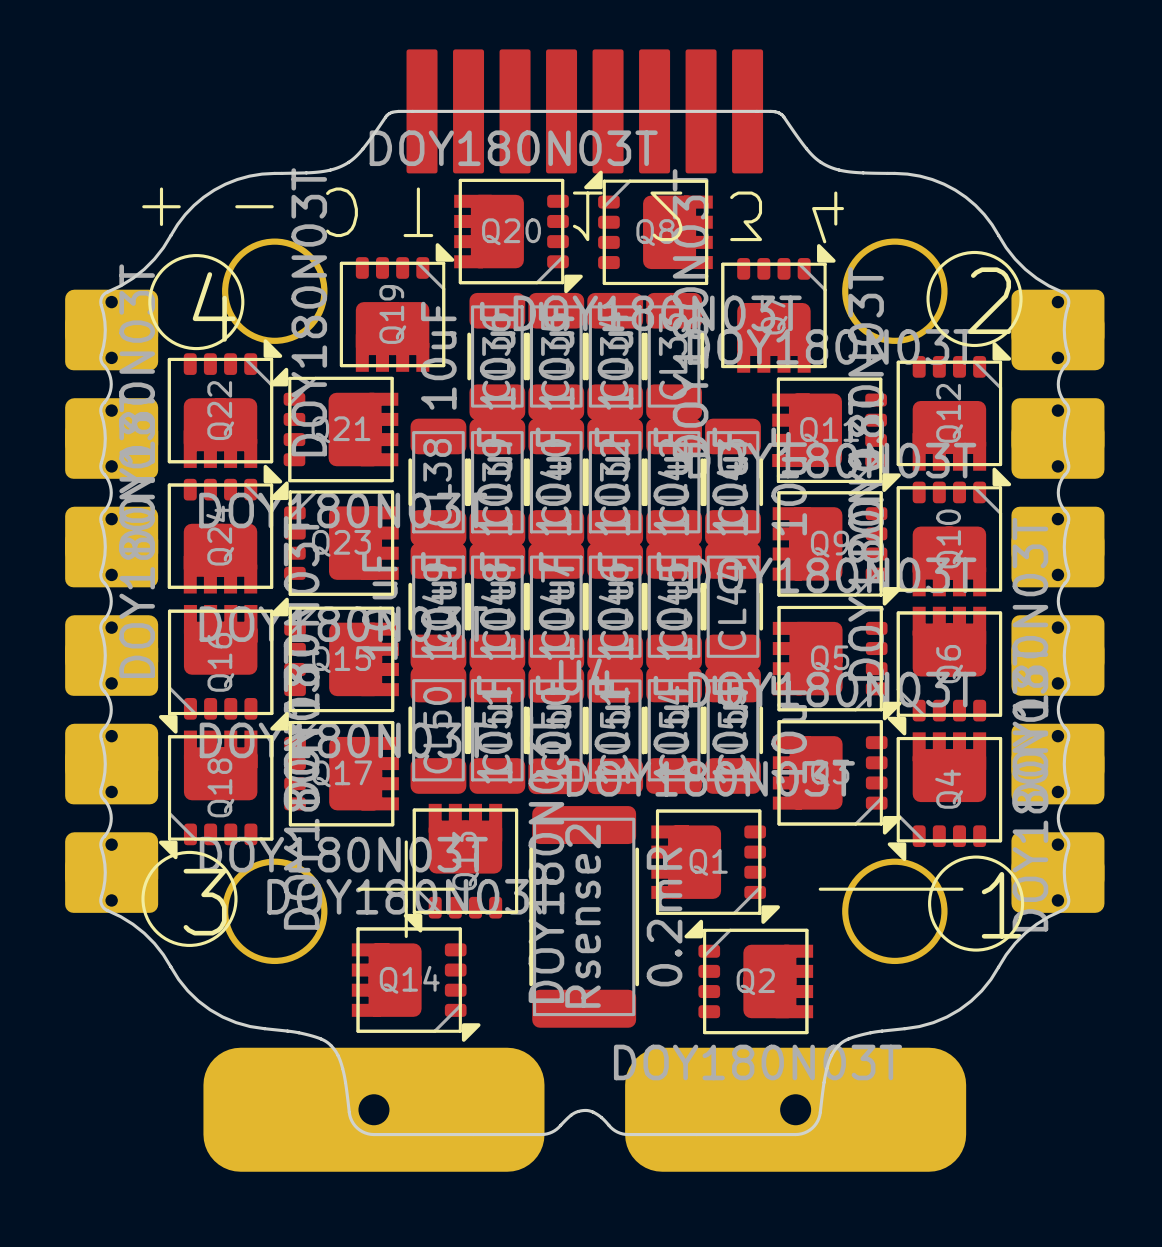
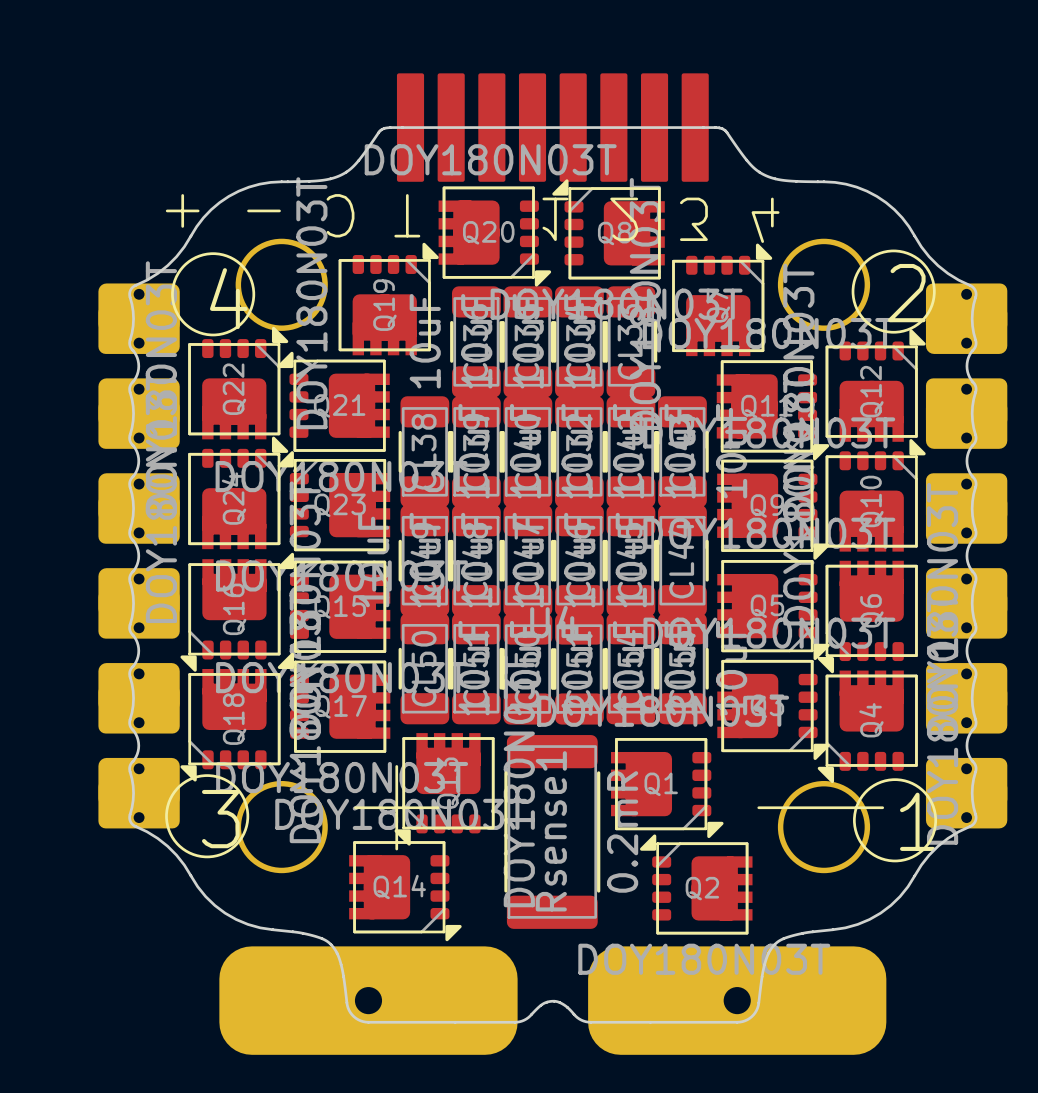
Rsense2 name: Rsense2 (583, 916) -> Rsense1 (551, 831)

